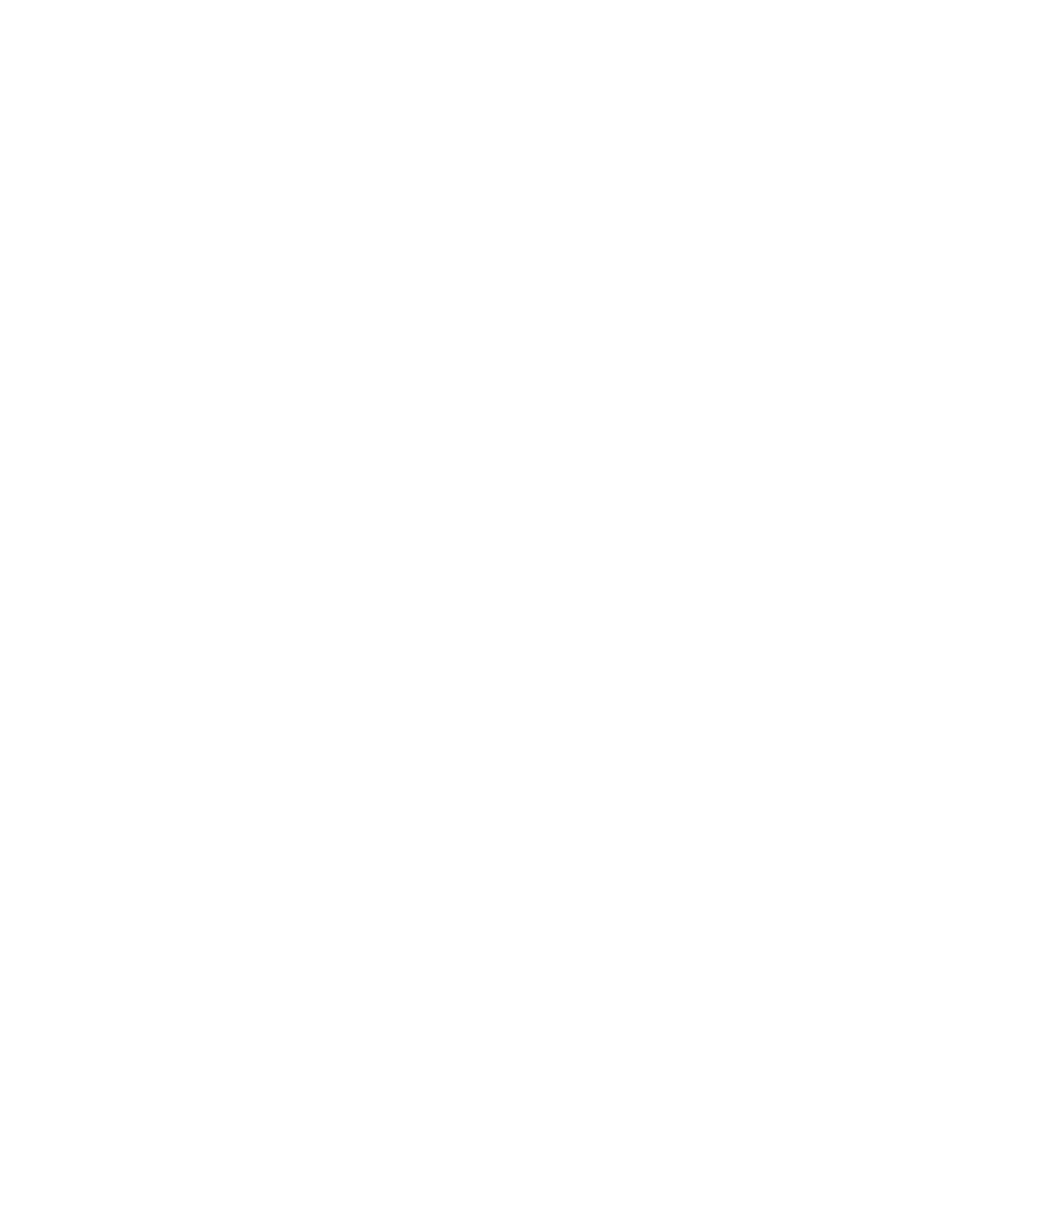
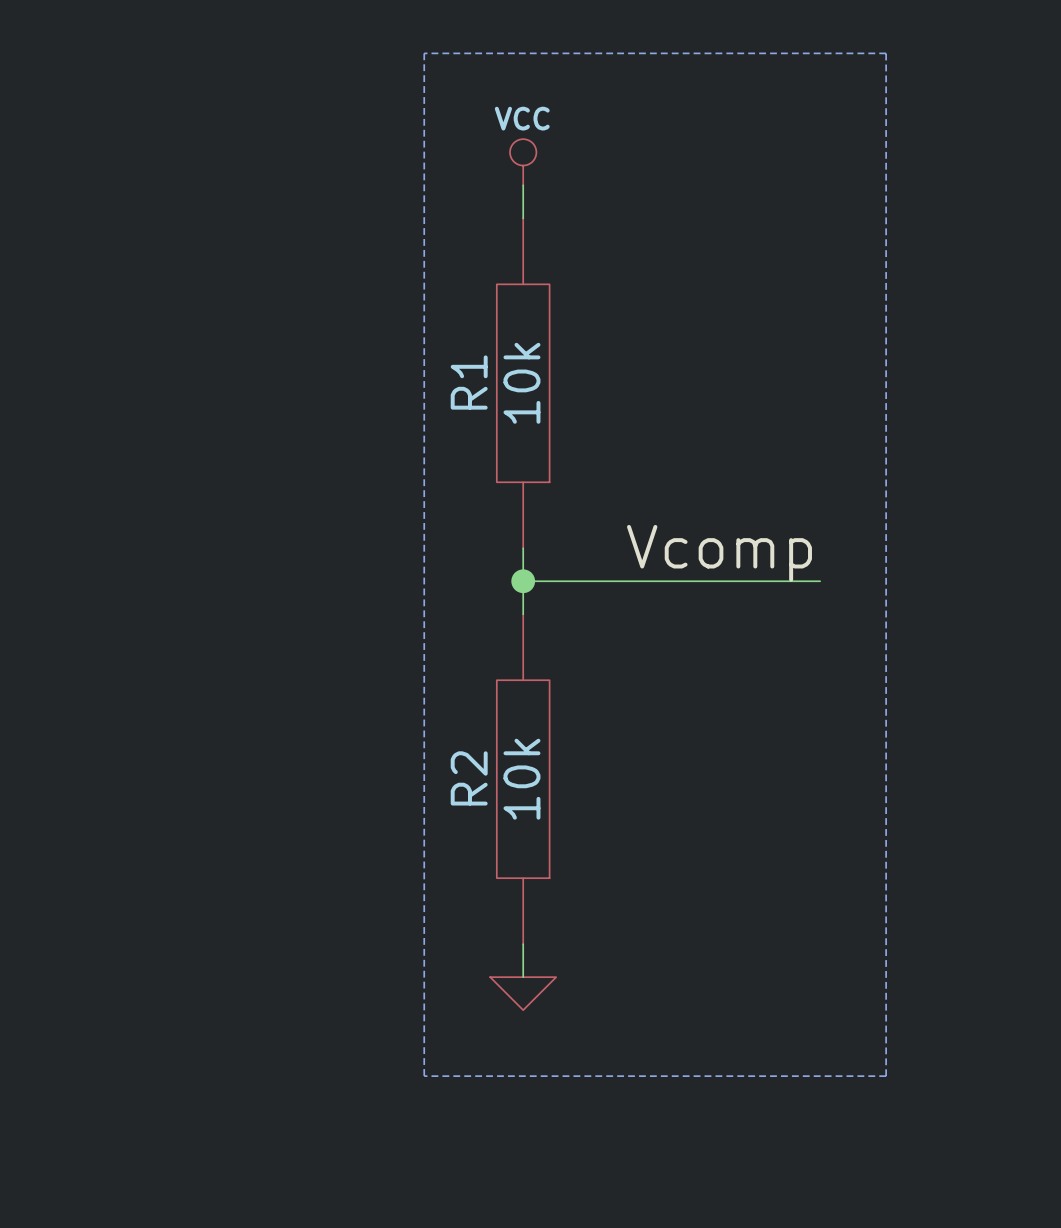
line: none -> (424, 53) (886, 53) (886, 1076) (424, 1076) (424, 53)
power symbol: none -> VCC (523, 162)
wire: none -> (523, 185) (523, 218)
R1: none -> 10k (523, 383)
wire: none -> (523, 548) (523, 614)
label: none -> Vcomp (719, 553)
wire: none -> (523, 581) (820, 581)
junction: none -> (523, 581)
R2: none -> 10k (523, 779)
wire: none -> (523, 944) (523, 977)
power symbol: none -> (523, 993)

